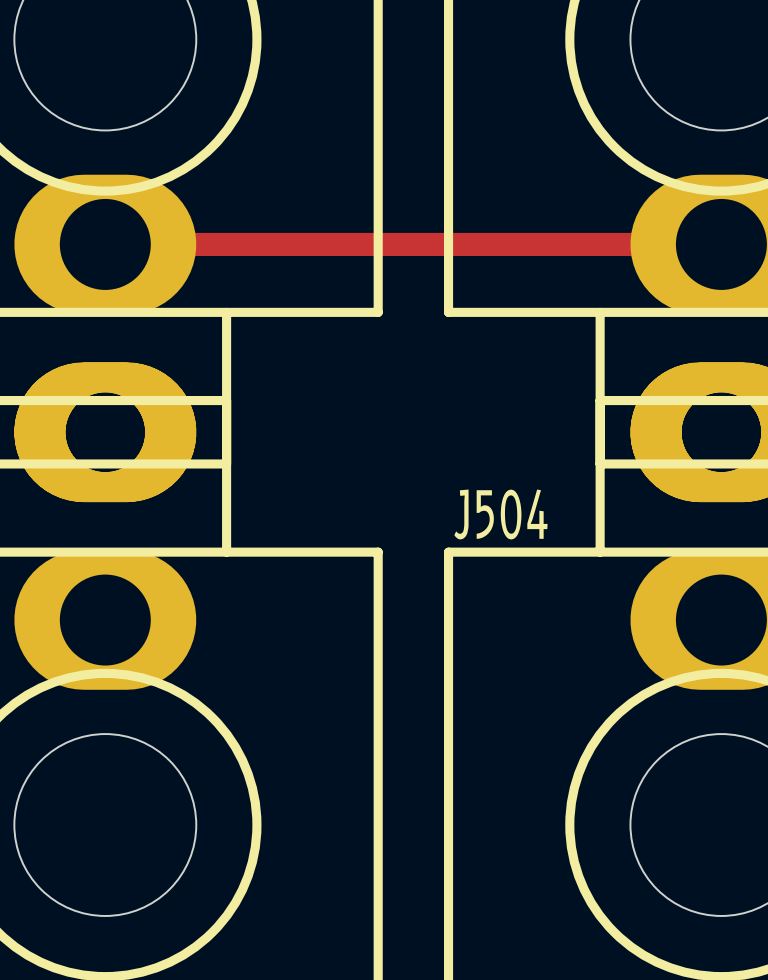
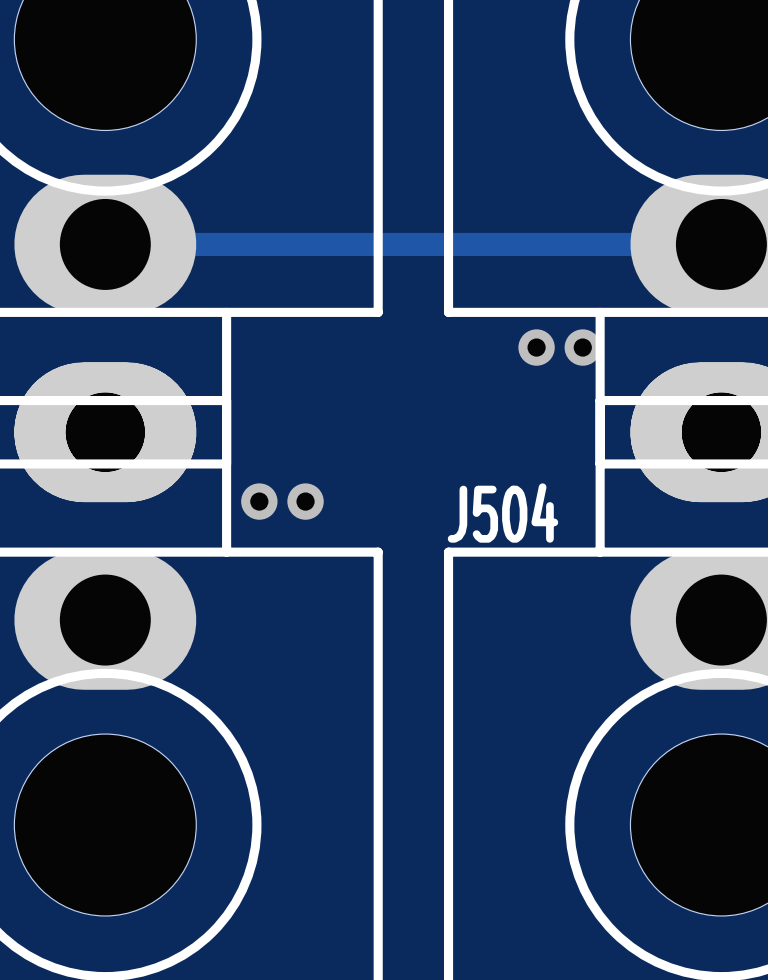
via: none -> (536, 347)
via: none -> (582, 347)
via: none -> (259, 501)
via: none -> (305, 501)

